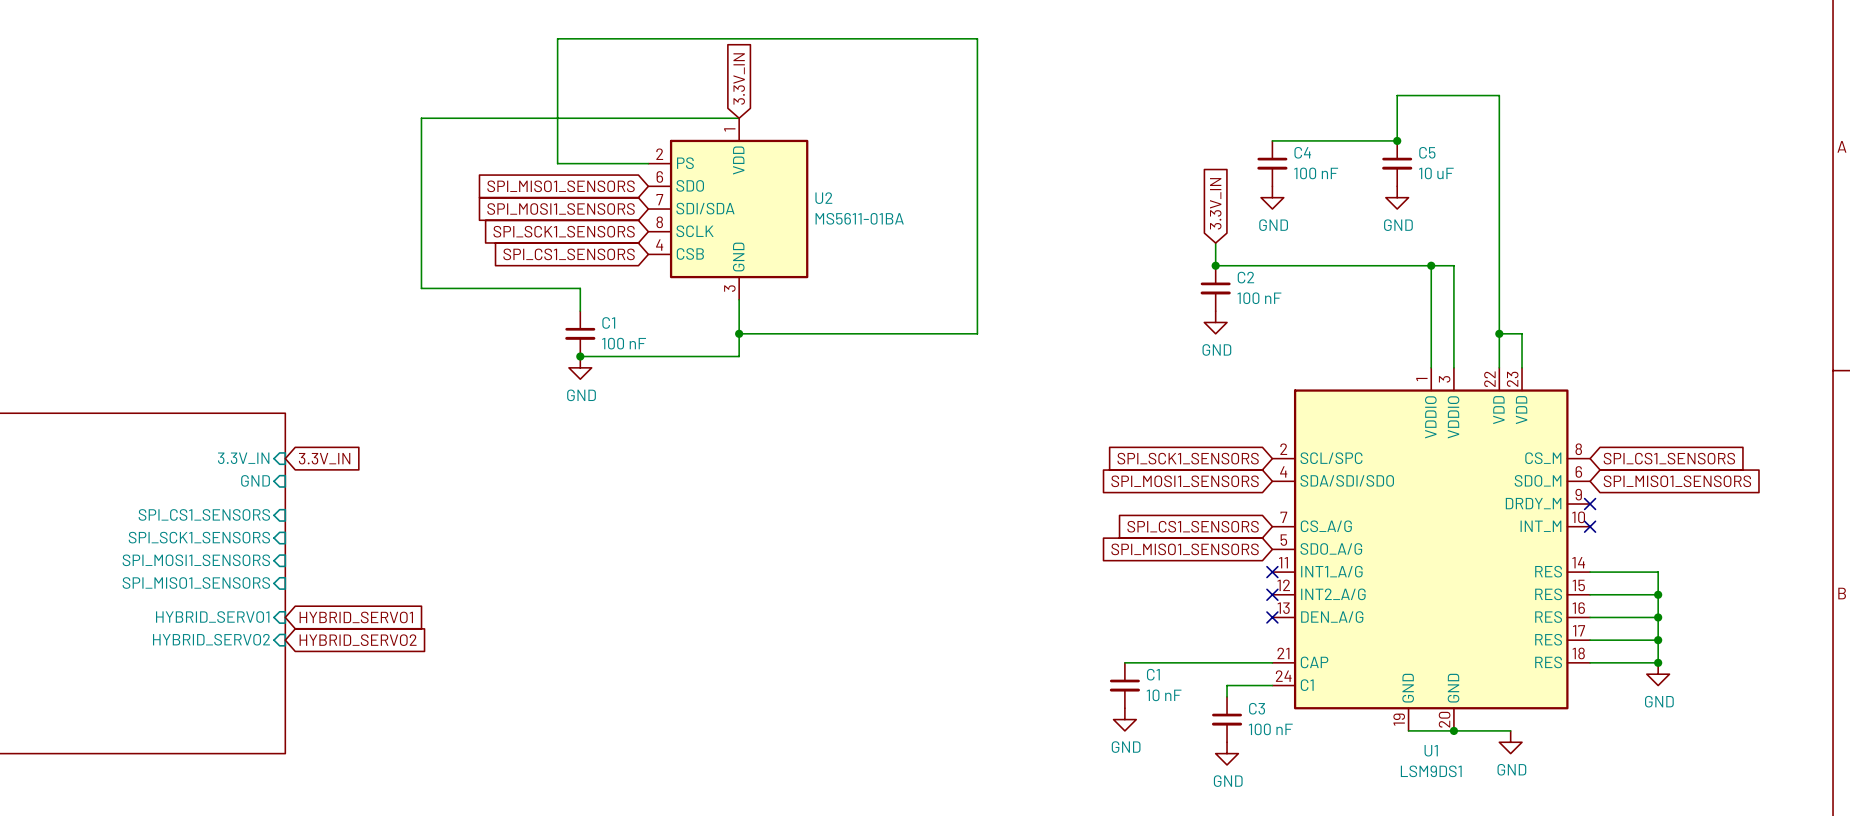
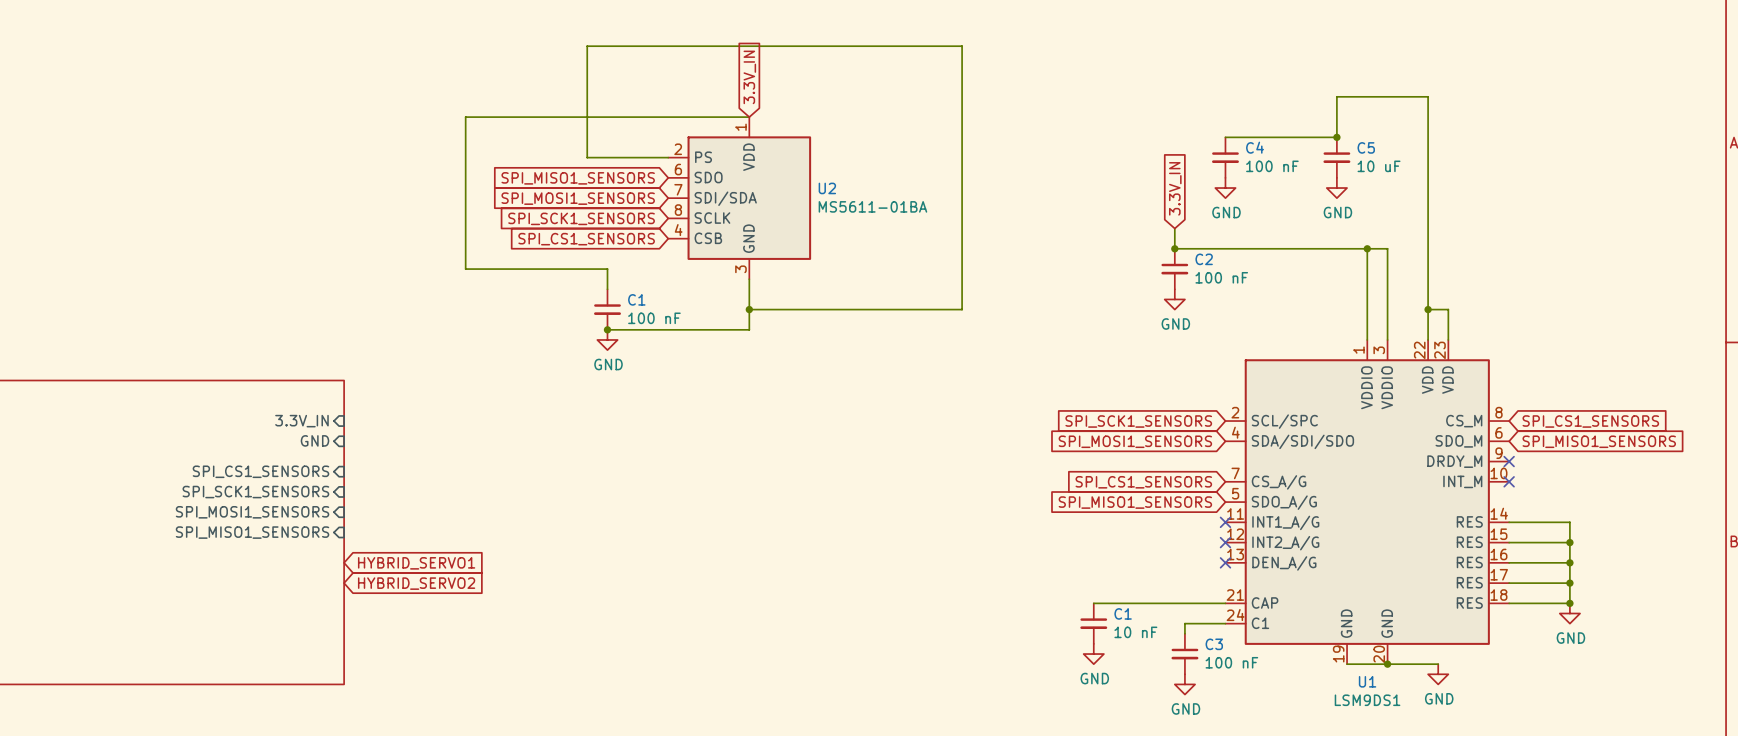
global label: 3.3V_IN (324, 458) -> none
sheet pin: HYBRID_SERVO1 (212, 617) -> none
sheet pin: HYBRID_SERVO2 (211, 639) -> none

